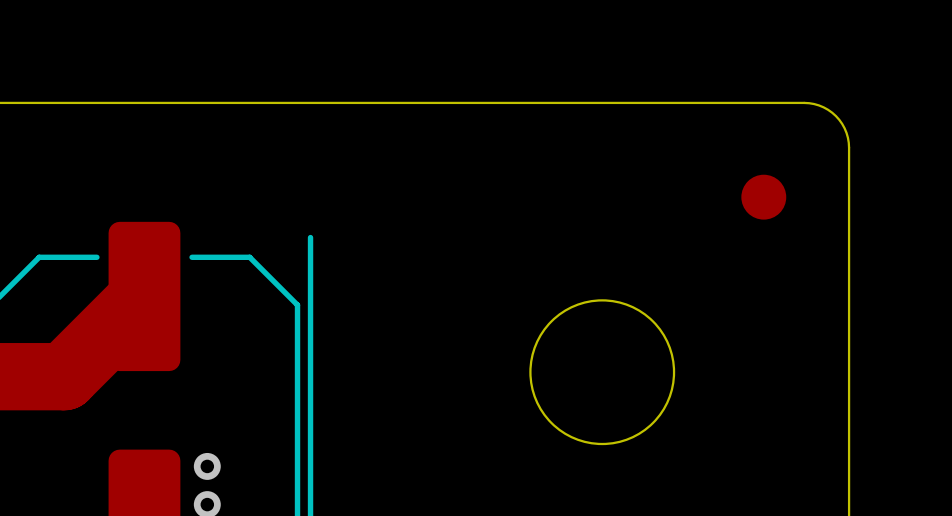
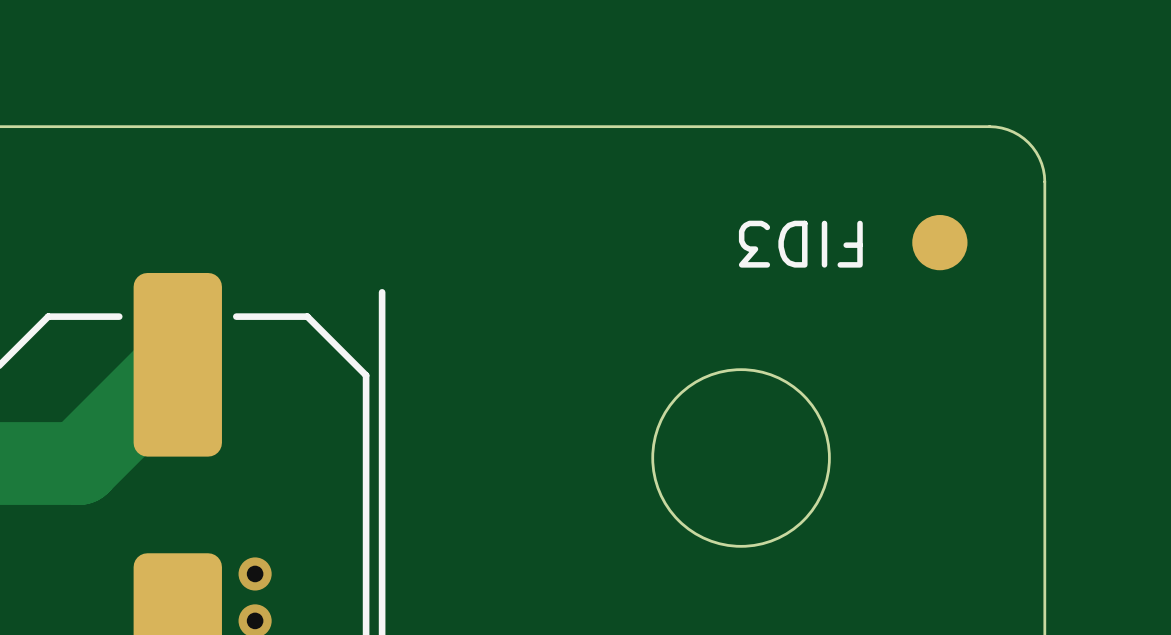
FID3 name: none -> FID3 (800, 244)

